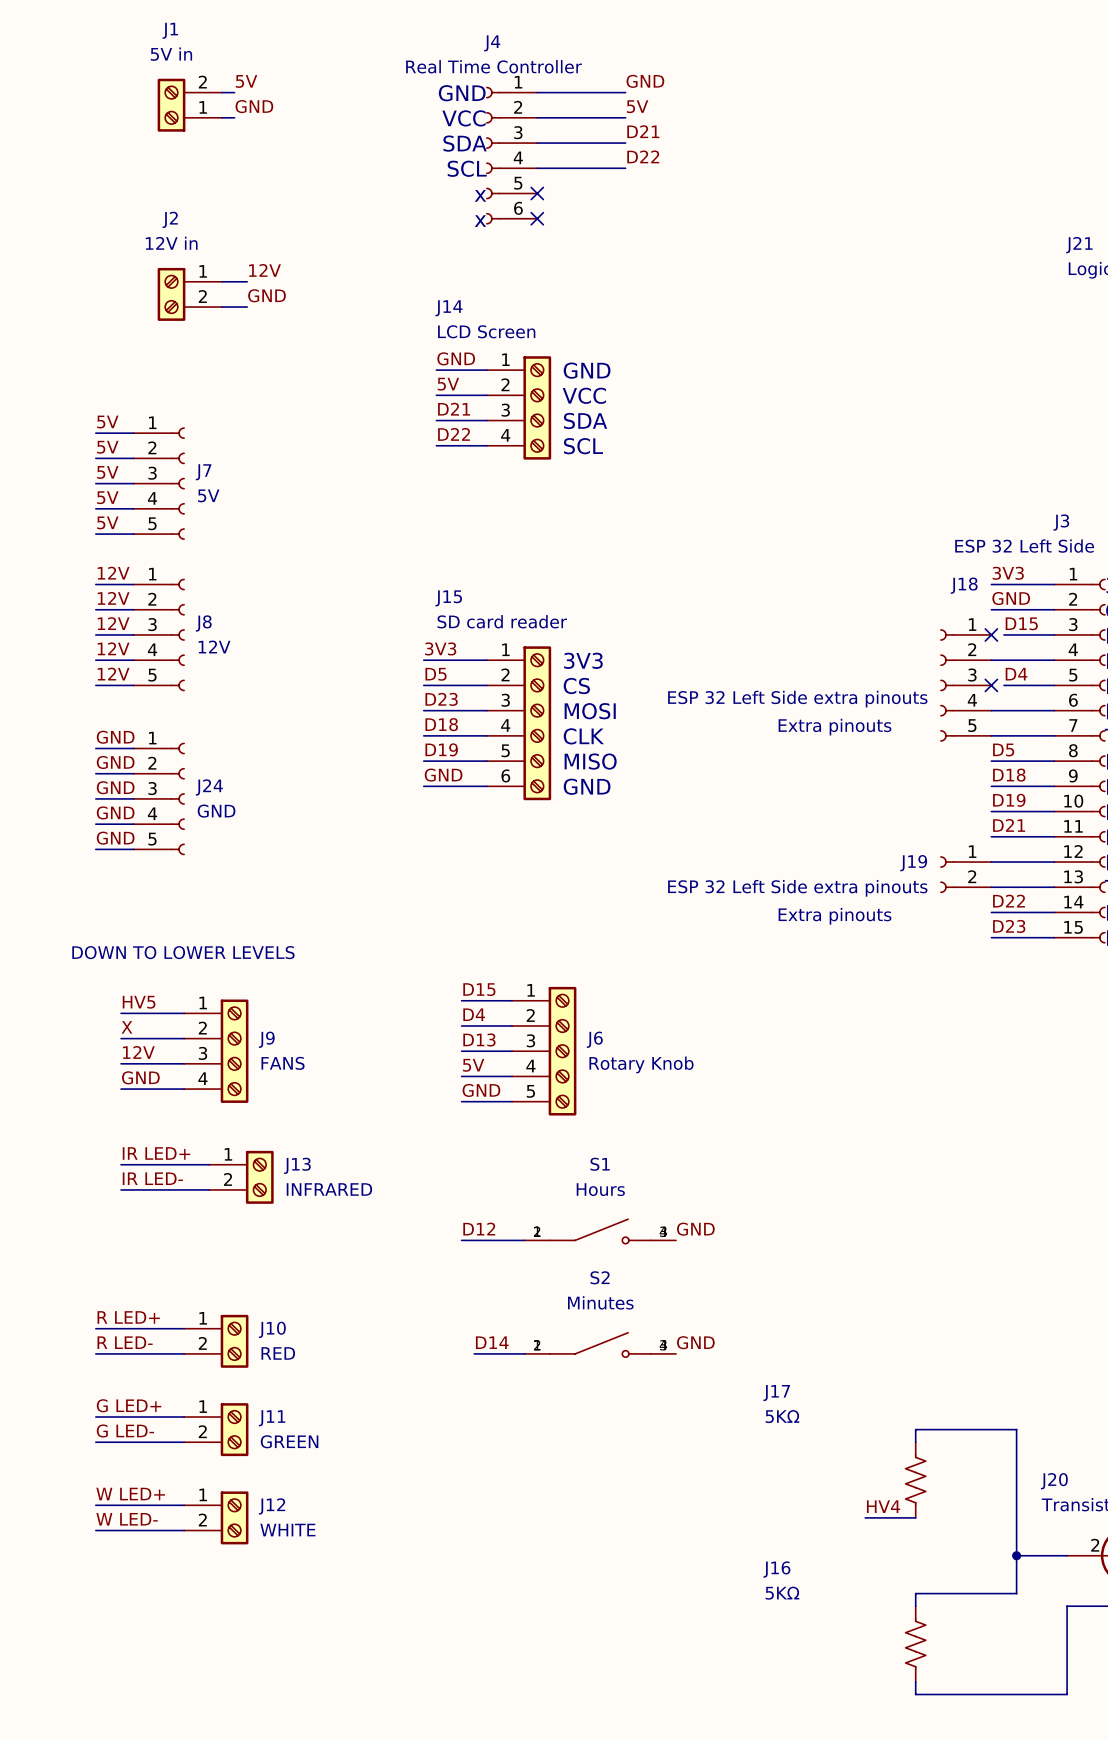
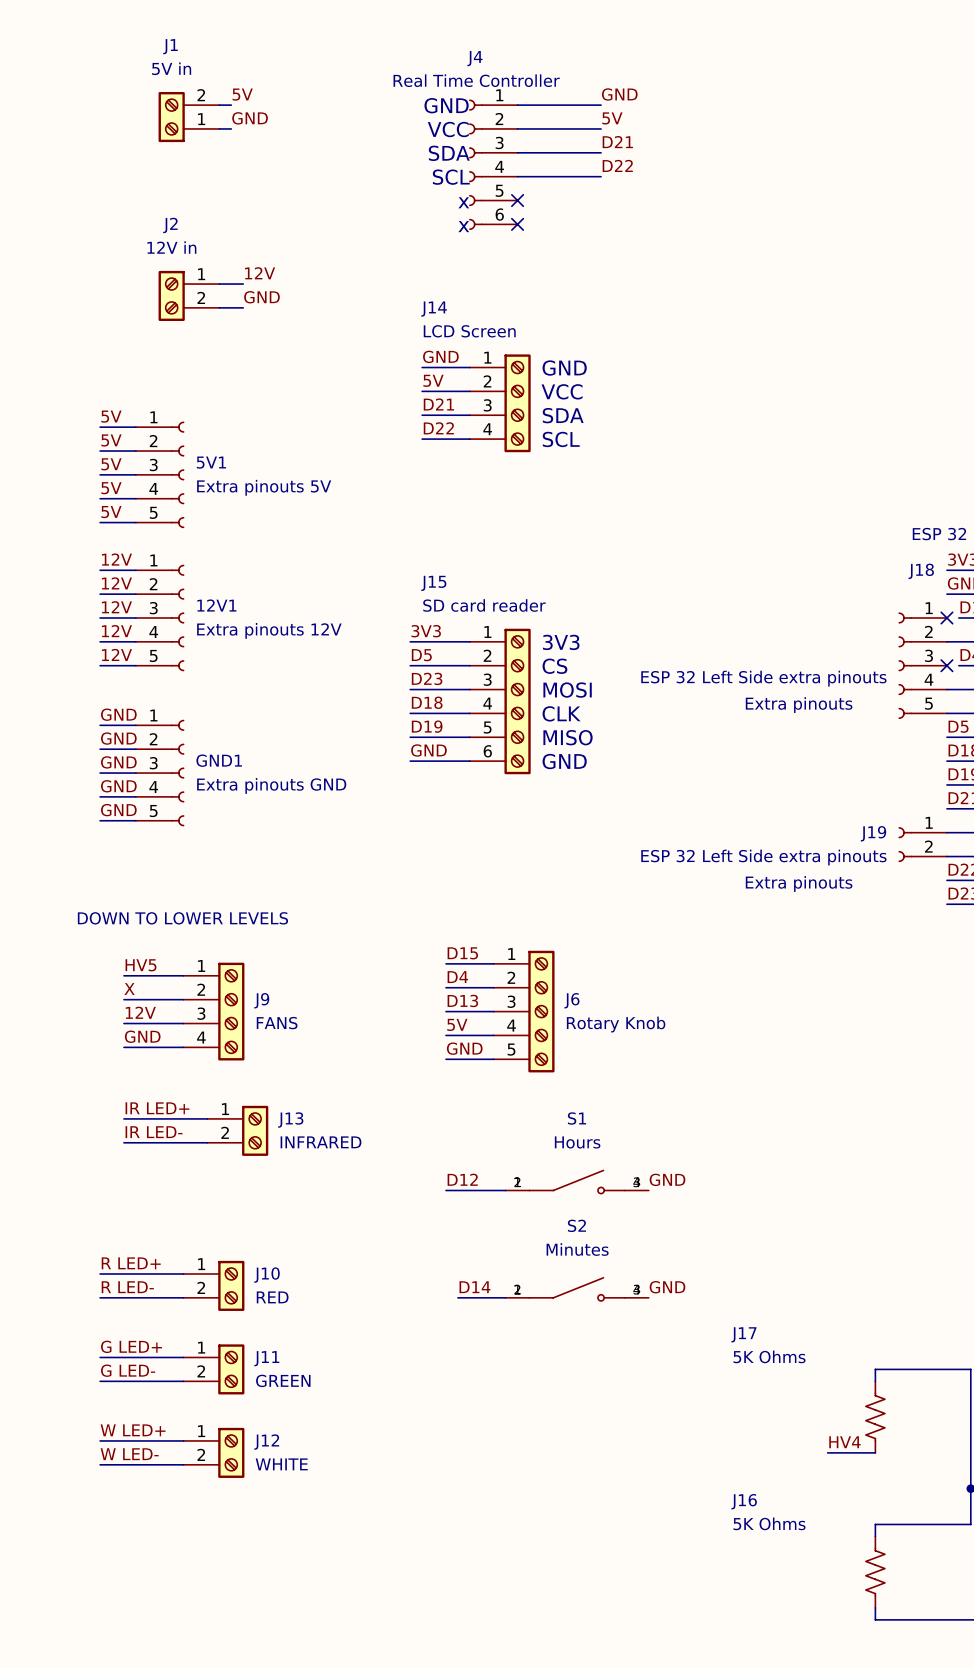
J7 name: J7 (203, 472) -> 5V1 (211, 462)
J7 value: 5V (208, 495) -> Extra pinouts 5V (264, 487)
J8 name: J8 (203, 623) -> 12V1 (216, 605)
J8 value: 12V (214, 647) -> Extra pinouts 12V (269, 630)
J24 name: J24 (209, 787) -> GND1 (219, 760)
J24 value: GND (216, 811) -> Extra pinouts GND (271, 785)
J17 value: 5KΩ (782, 1416) -> 5K Ohms (769, 1356)
J16 value: 5KΩ (782, 1593) -> 5K Ohms (769, 1523)

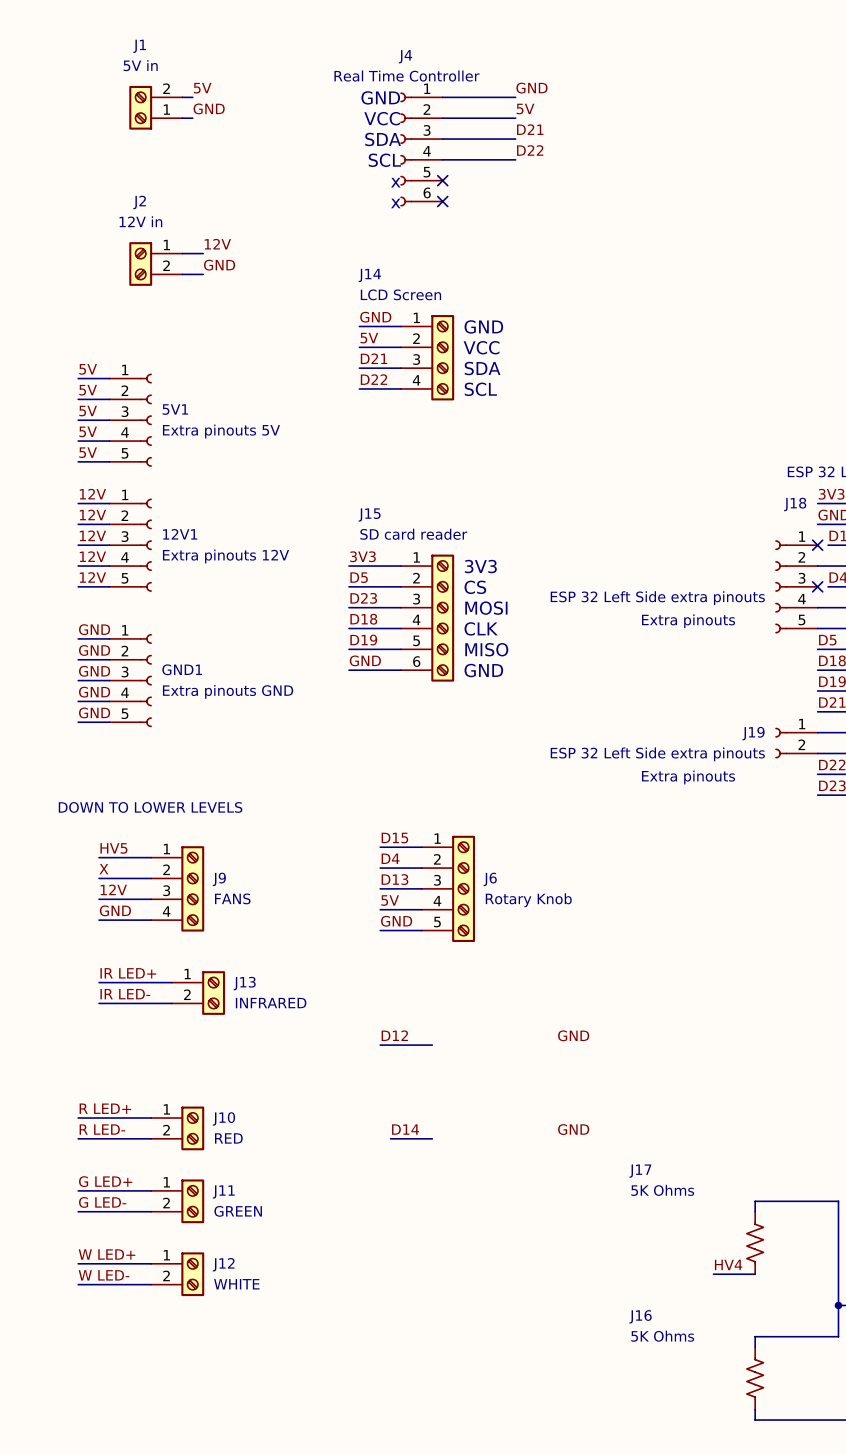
S1: Hours (577, 1182) -> none
S2: Minutes (577, 1289) -> none

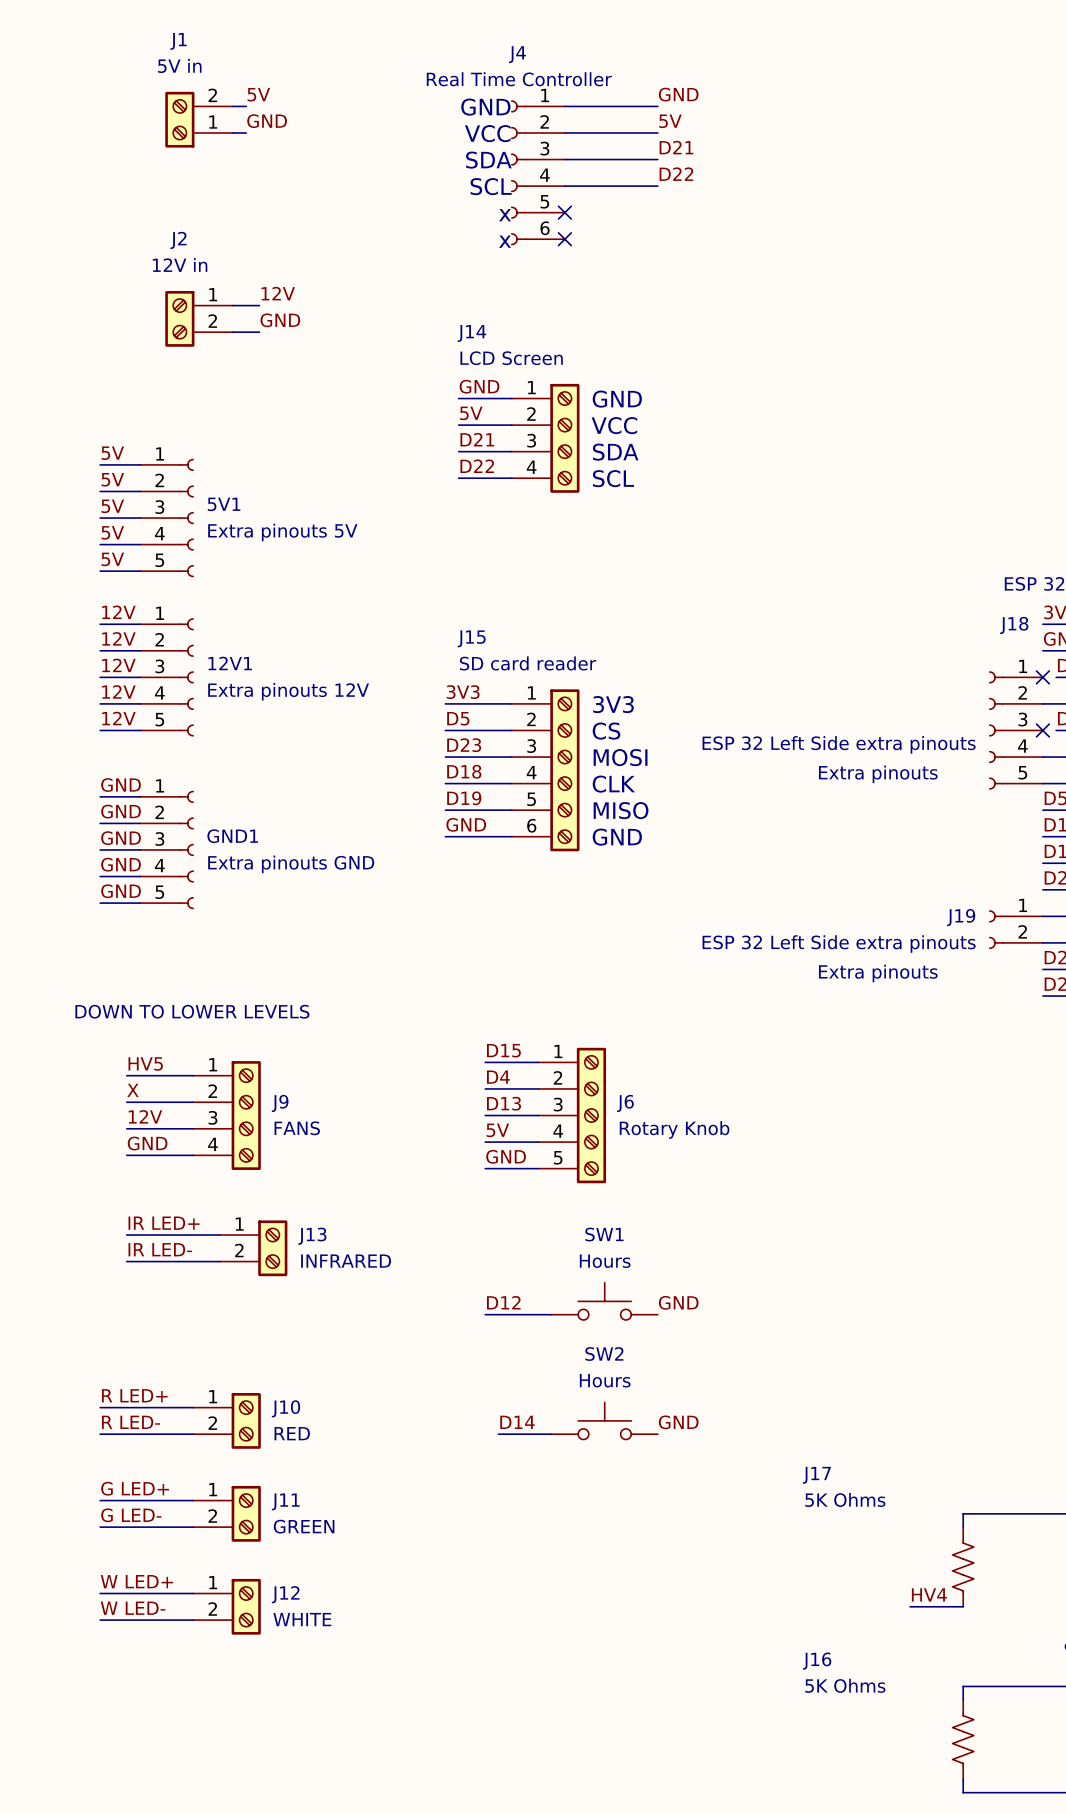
SW1: none -> Hours (604, 1301)
label position: GND (573, 1035) -> GND (678, 1302)
SW2: none -> Hours (604, 1420)
label position: GND (573, 1129) -> GND (678, 1422)

